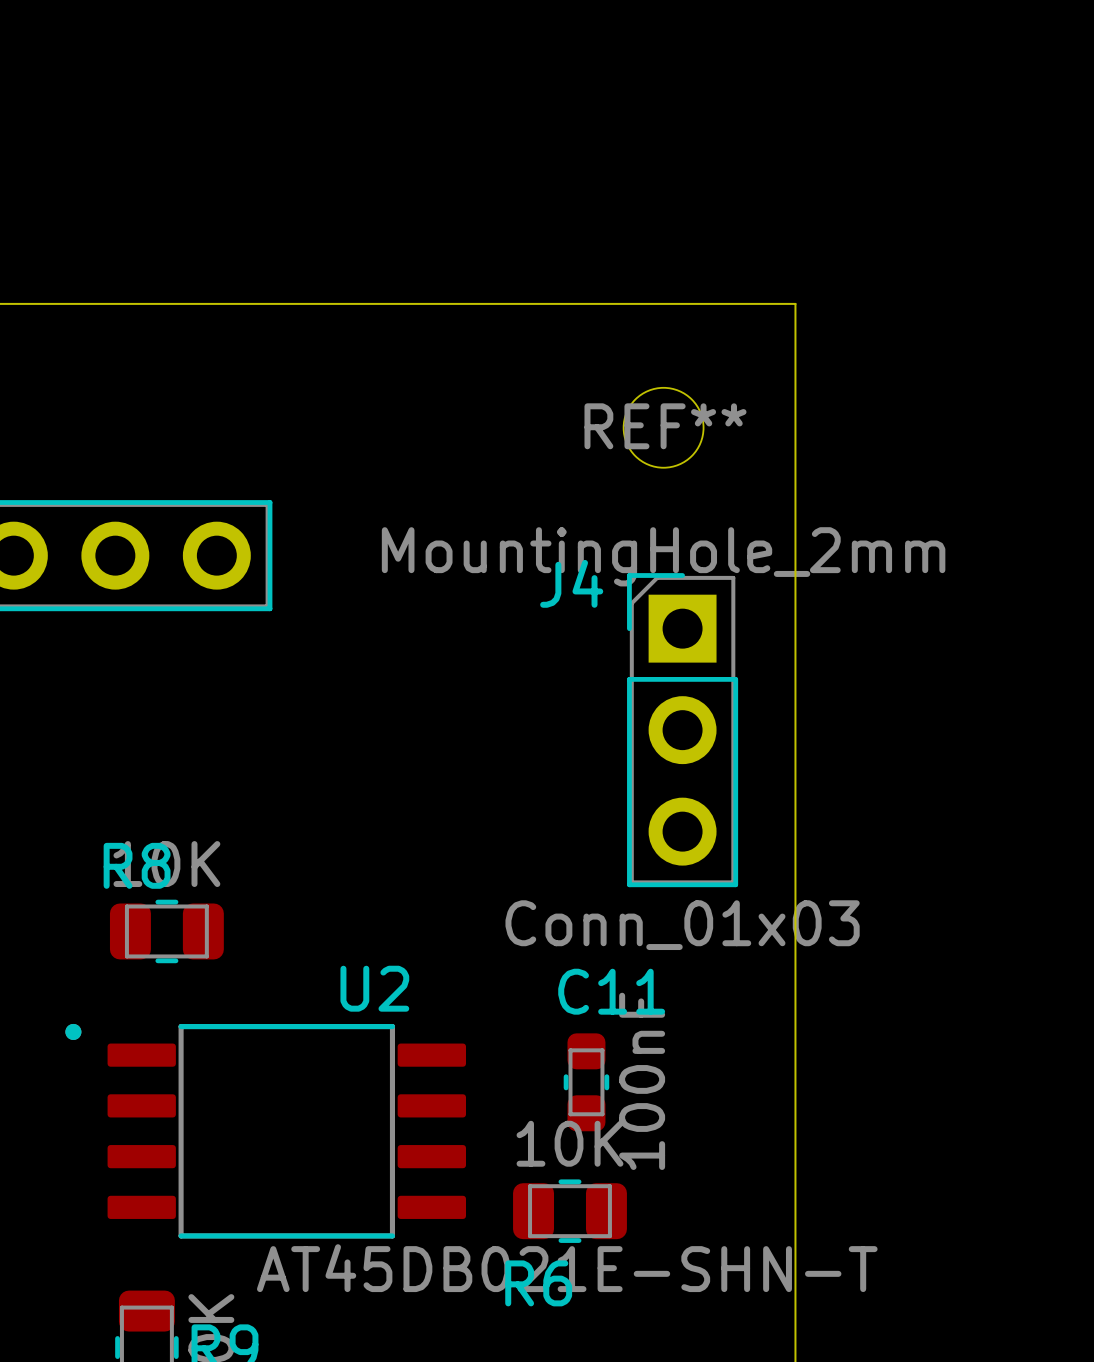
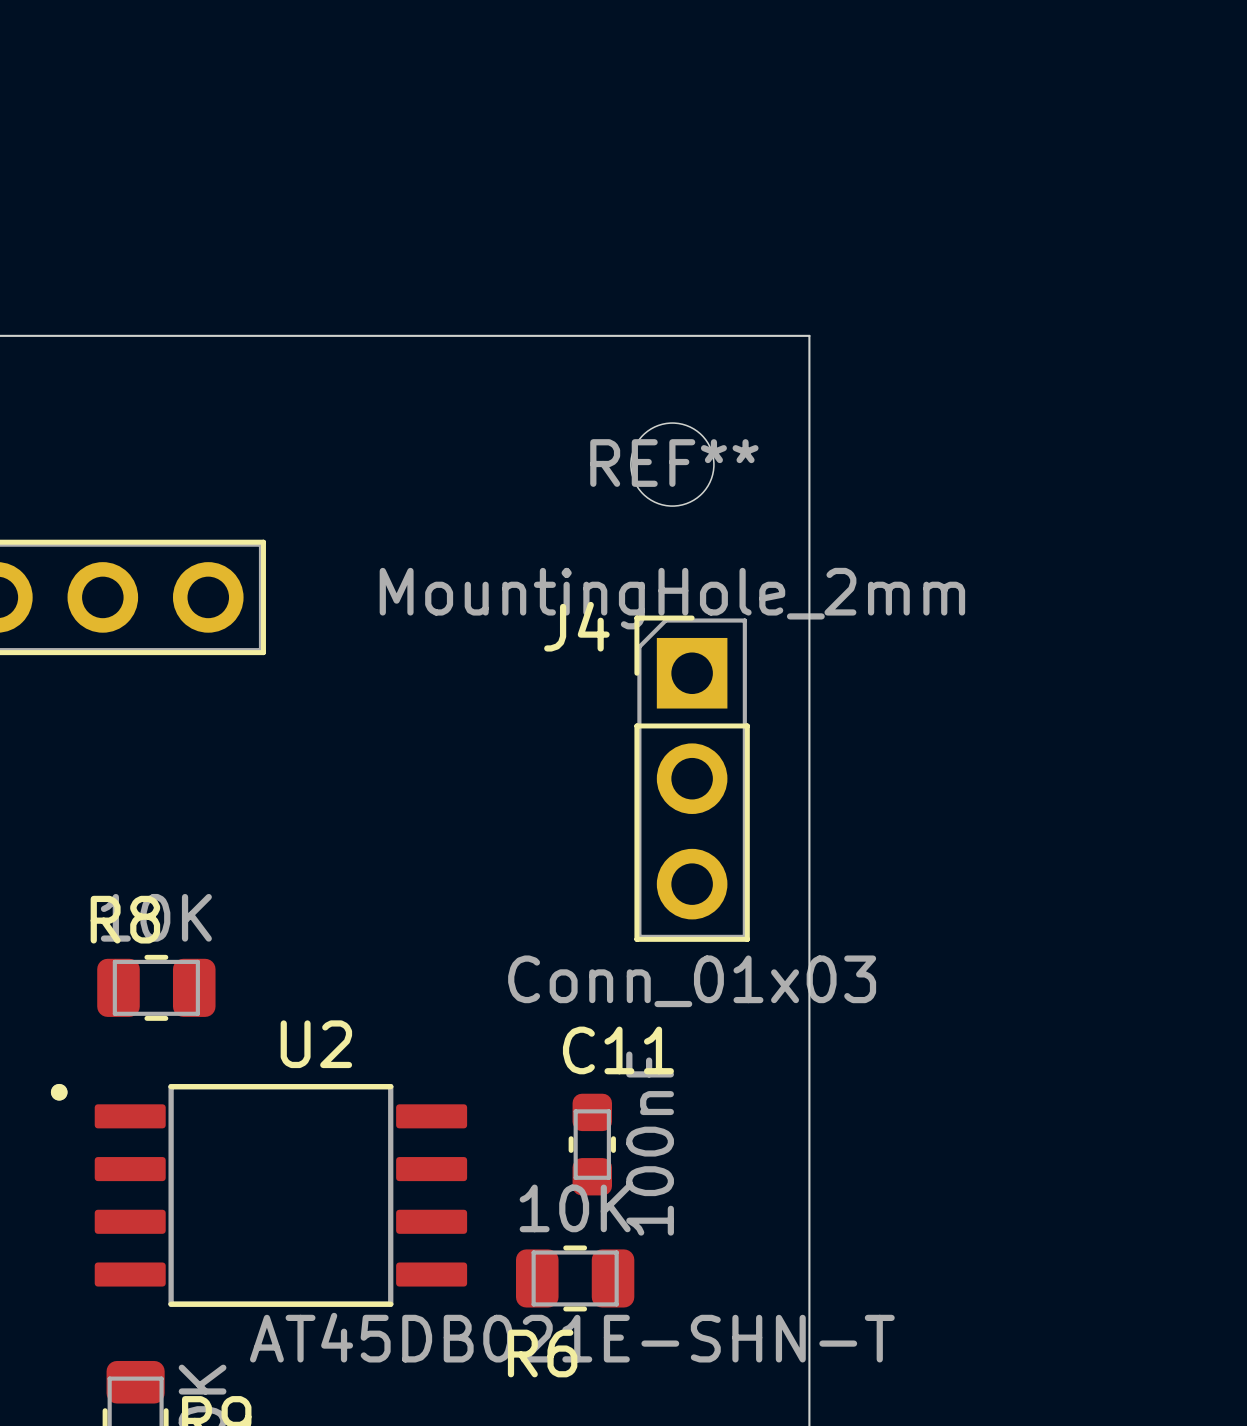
U2 name position: U2 (374, 988) -> U2 (316, 1044)

